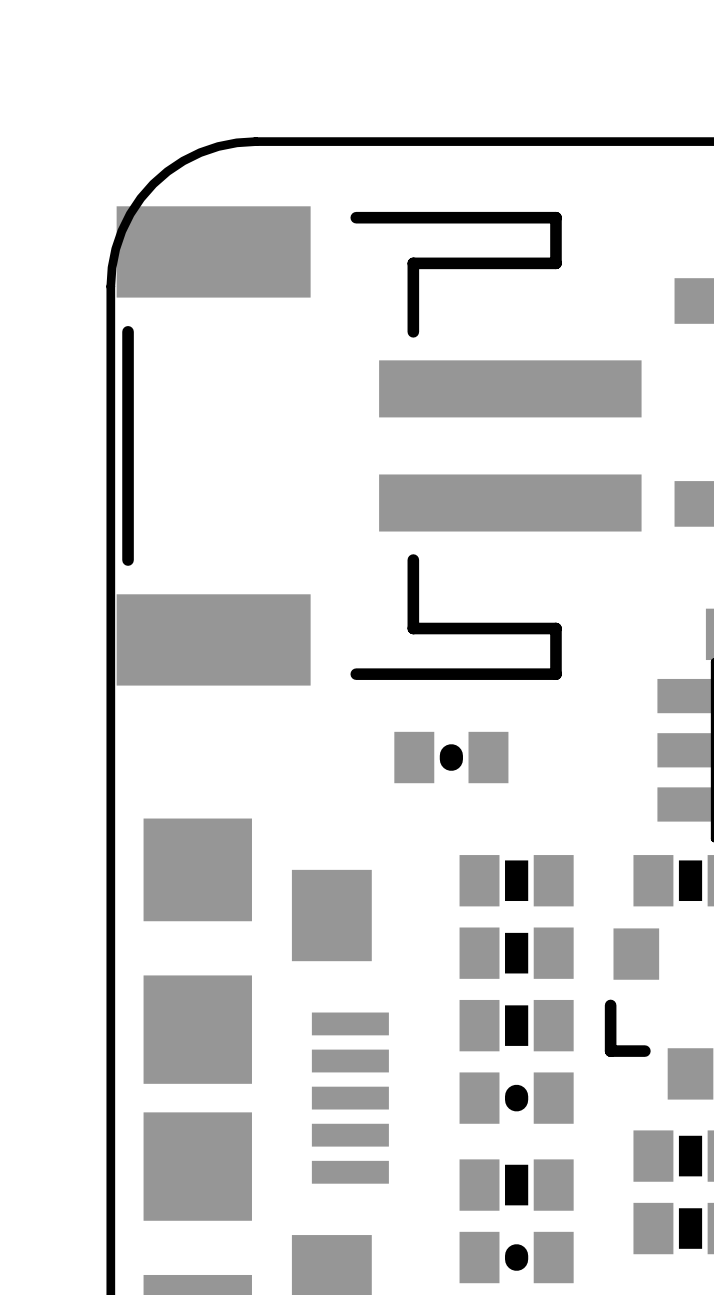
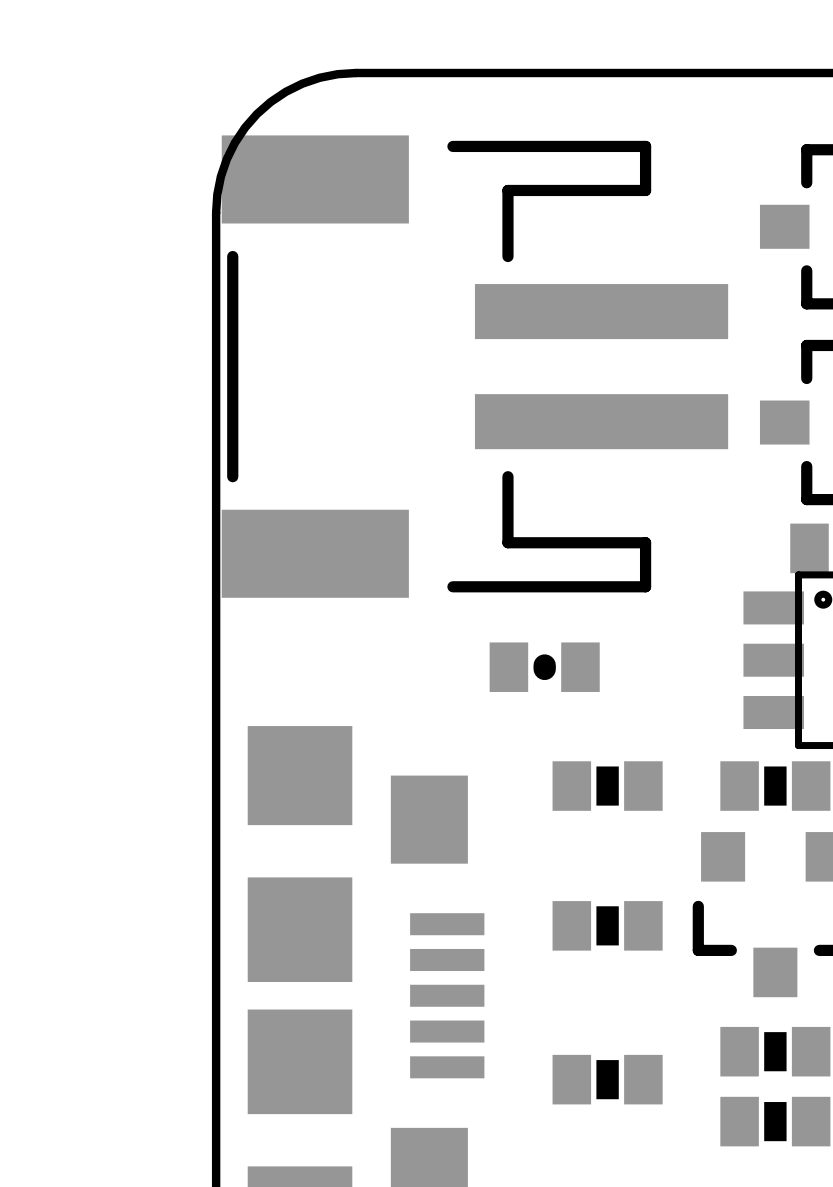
part: (516, 953) -> none
part: (516, 1098) -> none
part: (516, 1257) -> none

